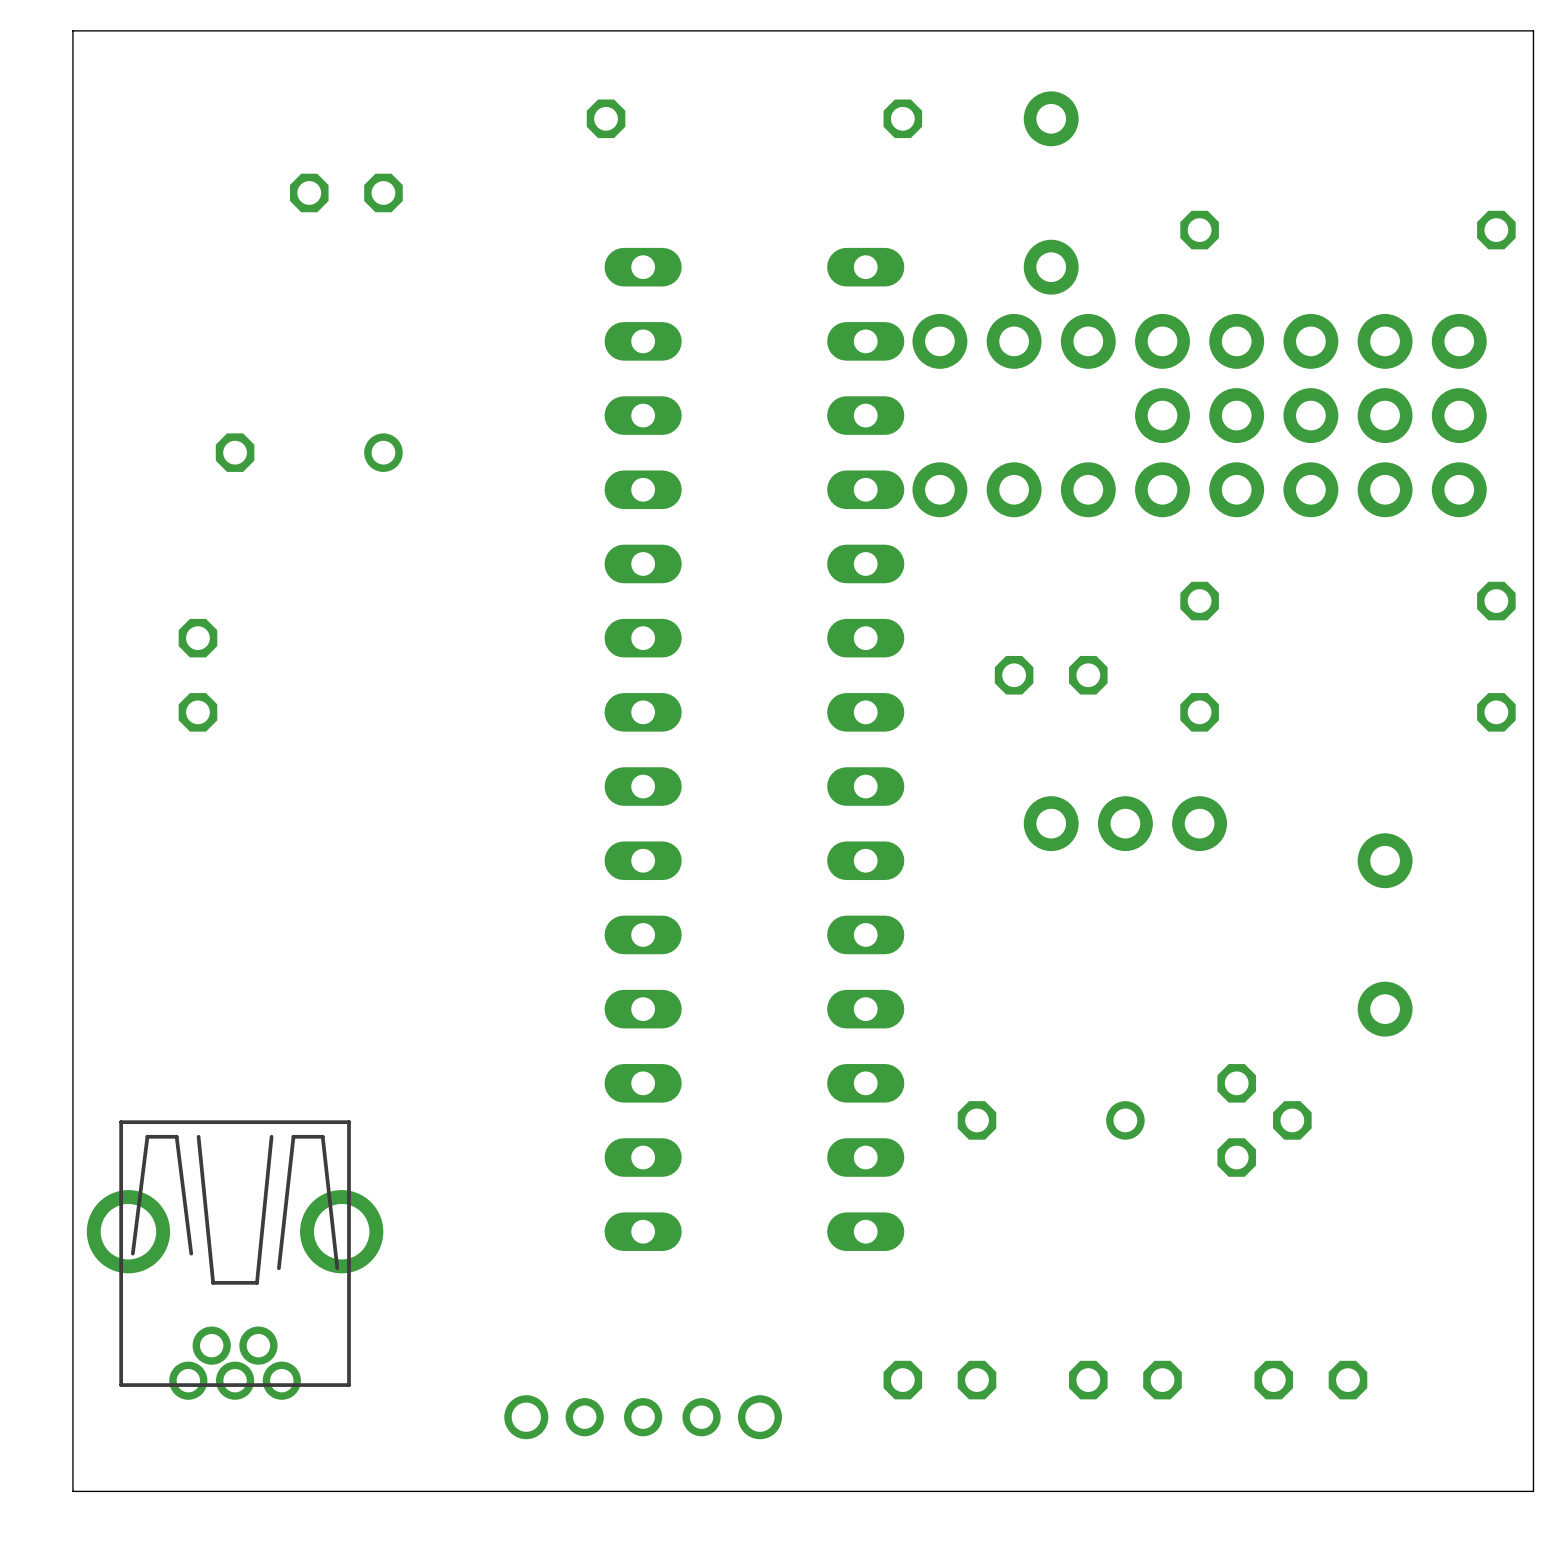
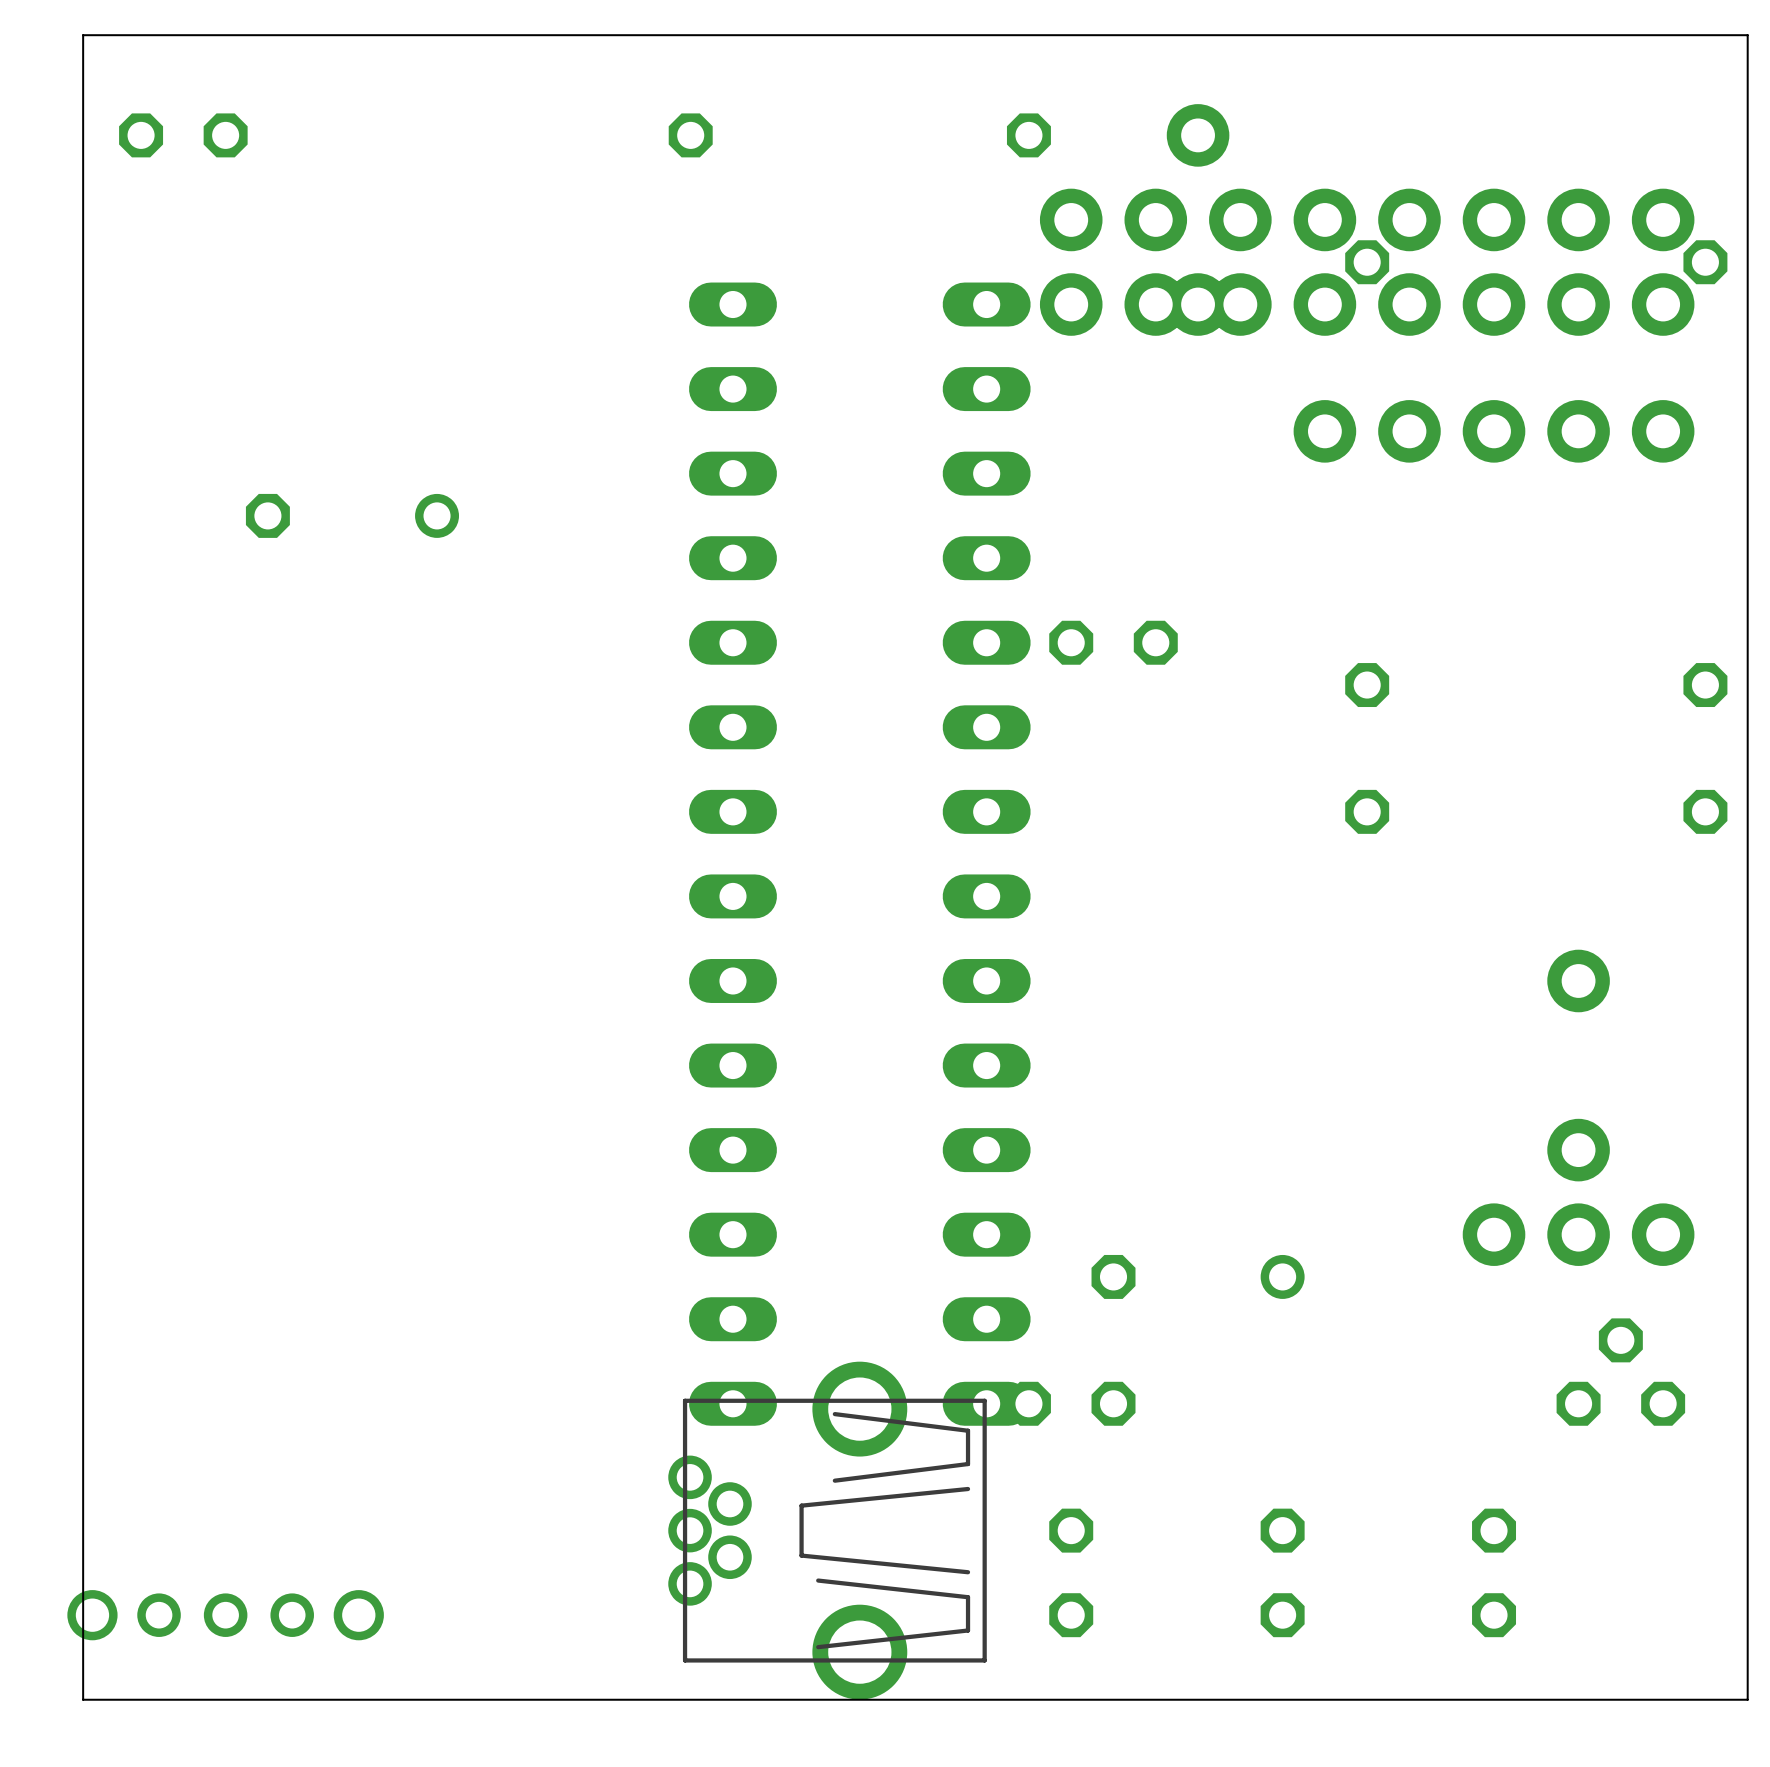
part position: (346, 192) -> (183, 135)
part: none -> (1367, 219)
part: none -> (1367, 304)
part: (1199, 341) -> none
part position: (1310, 415) -> (1494, 431)
part: (1199, 489) -> none
part: (197, 675) -> none
part position: (1051, 675) -> (1113, 642)
part position: (1125, 823) -> (1578, 1234)
part rotation: 0° (1264, 1120) -> 90° counterclockwise (1620, 1372)
part position: (1264, 1120) -> (1620, 1372)
part: none -> (1071, 1403)
part rotation: 0° (235, 1260) -> 90° clockwise (827, 1530)
part position: (235, 1260) -> (827, 1530)
part rotation: 0° (939, 1380) -> 90° clockwise (1071, 1572)
part rotation: 0° (1125, 1380) -> 90° clockwise (1282, 1572)
part rotation: 0° (1310, 1380) -> 90° clockwise (1494, 1572)
part position: (643, 1417) -> (225, 1615)

